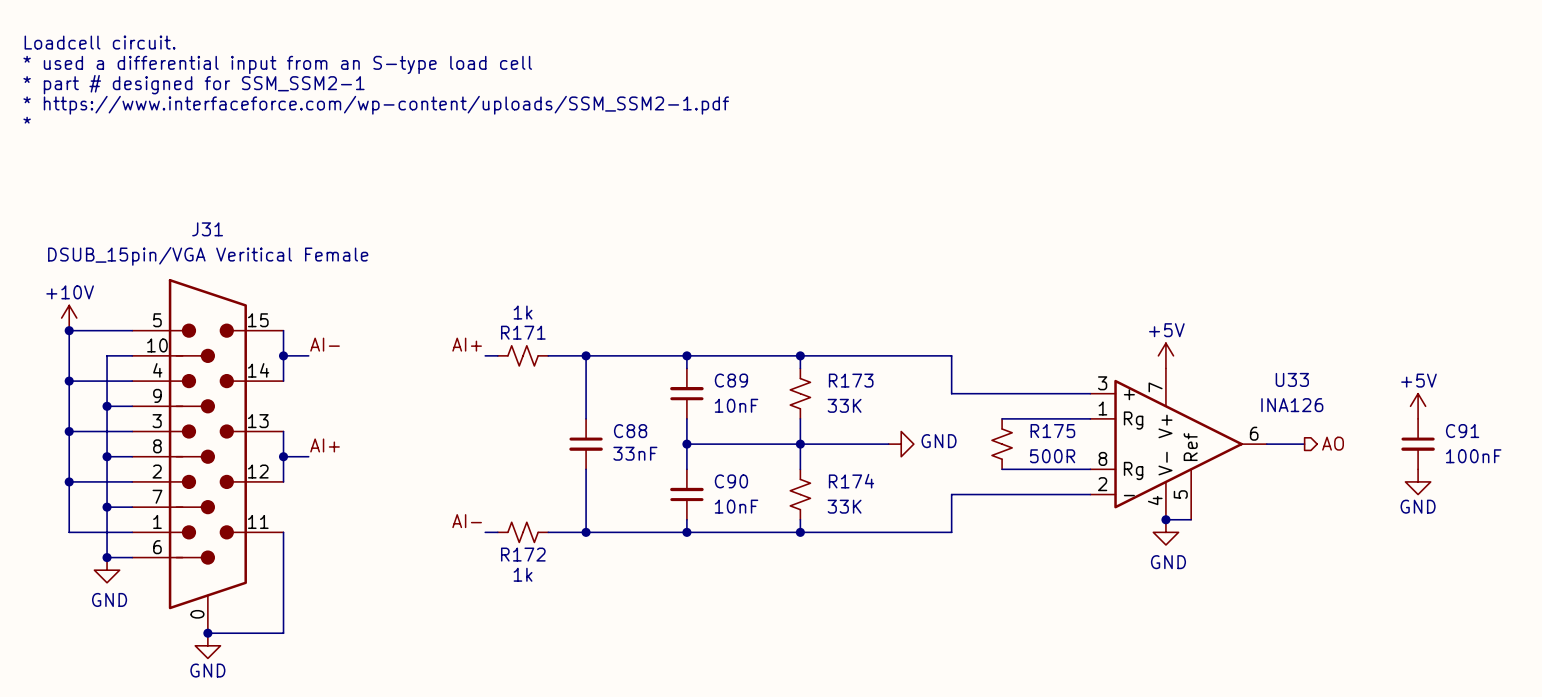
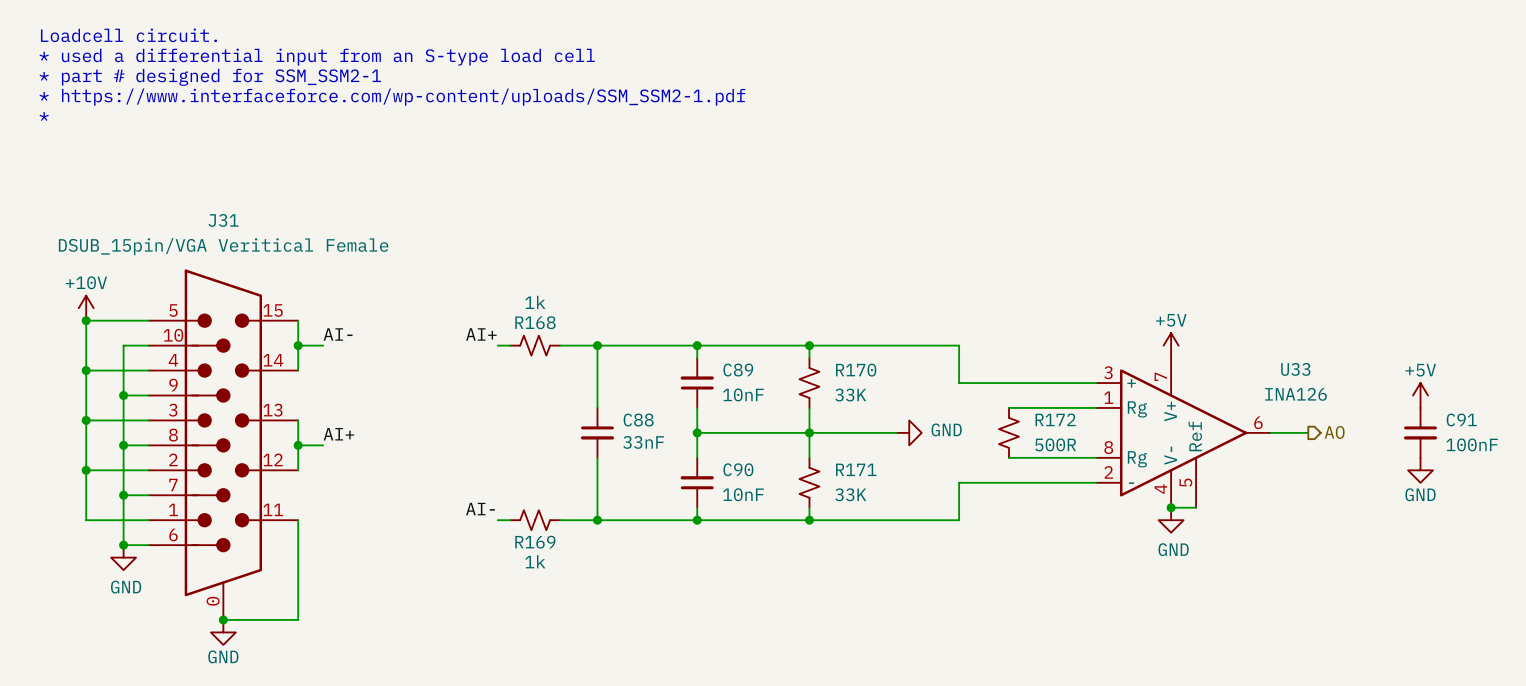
R171 name: R171 (523, 332) -> R168 (535, 322)
R173 name: R173 (851, 380) -> R170 (856, 370)
R175 name: R175 (1052, 431) -> R172 (1055, 419)
R174 name: R174 (851, 481) -> R171 (856, 469)
R172 name: R172 (523, 554) -> R169 (535, 542)

